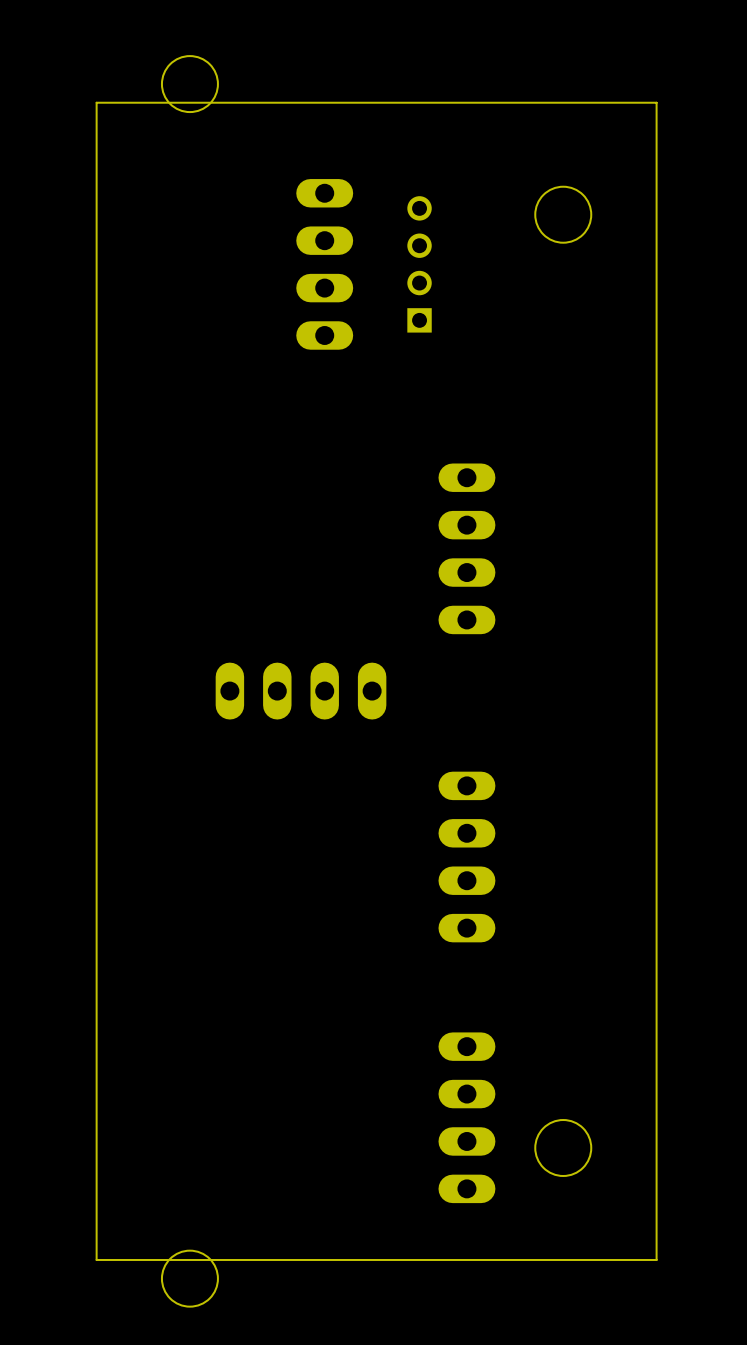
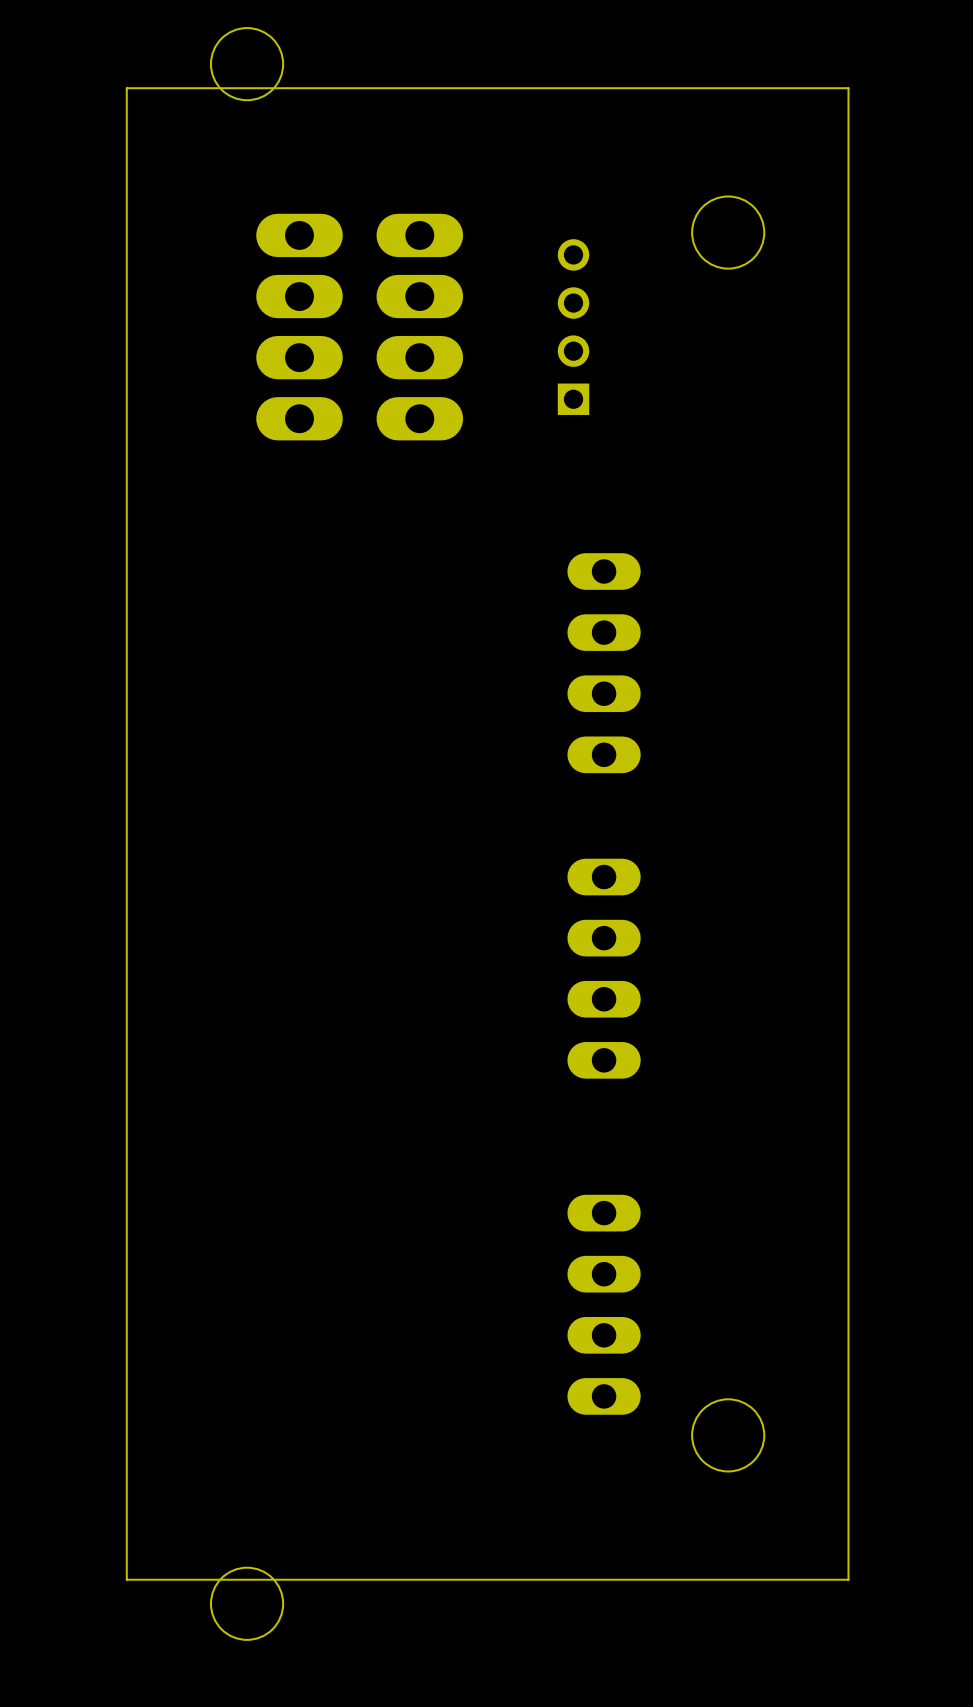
part: (324, 264) -> none
part position: (419, 264) -> (573, 327)
part: none -> (359, 327)
part: (301, 691) -> none
part position: (466, 857) -> (604, 968)
part position: (466, 1117) -> (604, 1304)

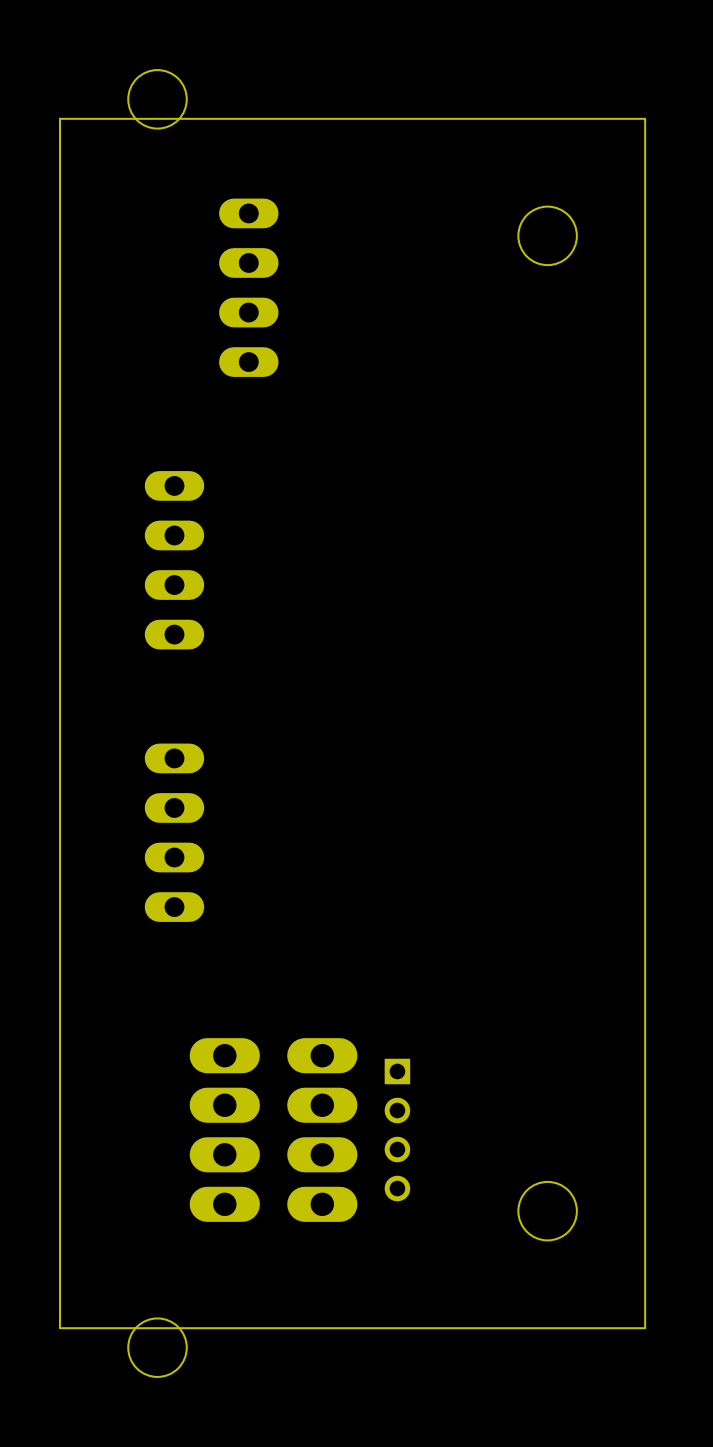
part: none -> (248, 287)
part: (359, 327) -> none
part: (573, 327) -> none
part: none -> (174, 560)
part: (604, 663) -> none
part: none -> (174, 832)
part: (604, 968) -> none
part: (604, 1304) -> none
part: none -> (273, 1130)
part: none -> (397, 1130)

